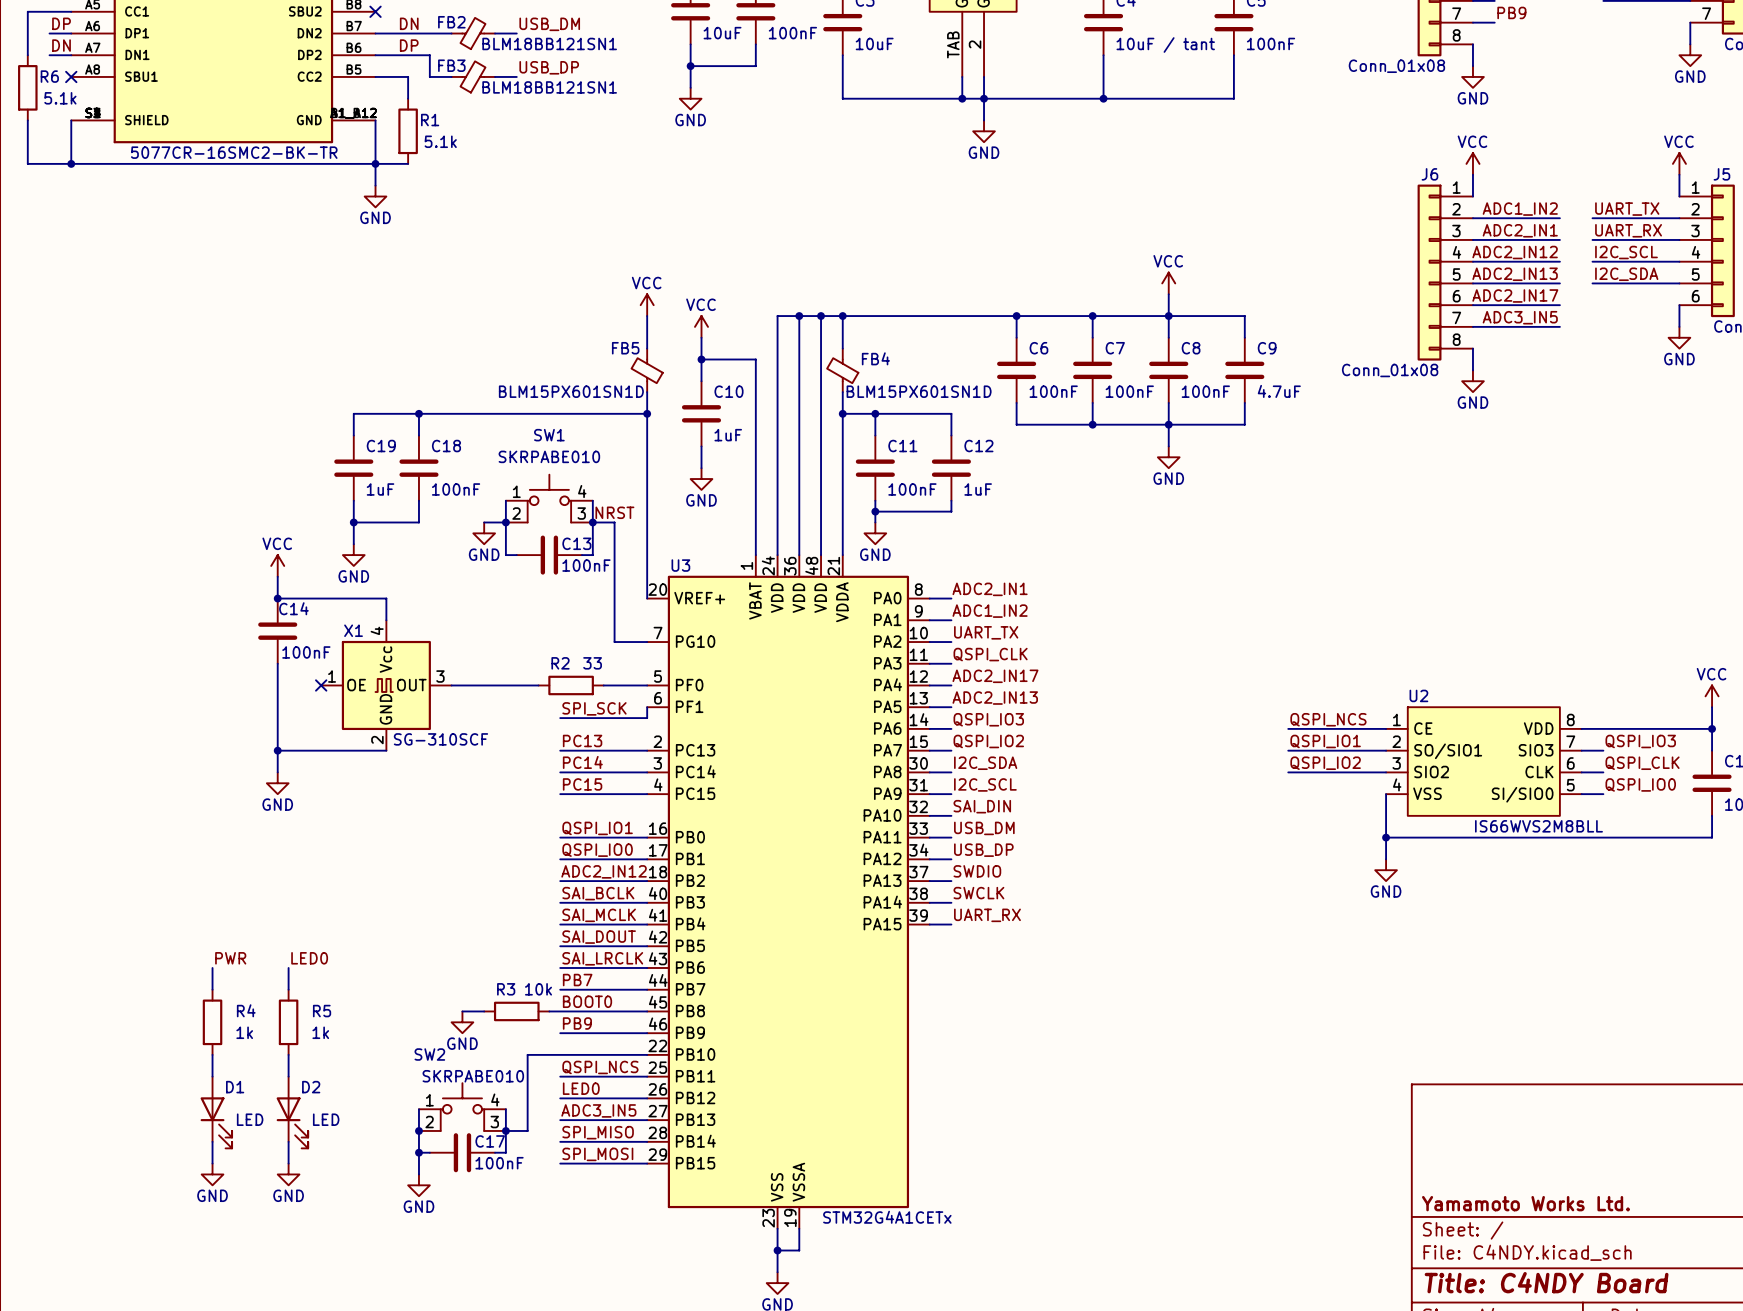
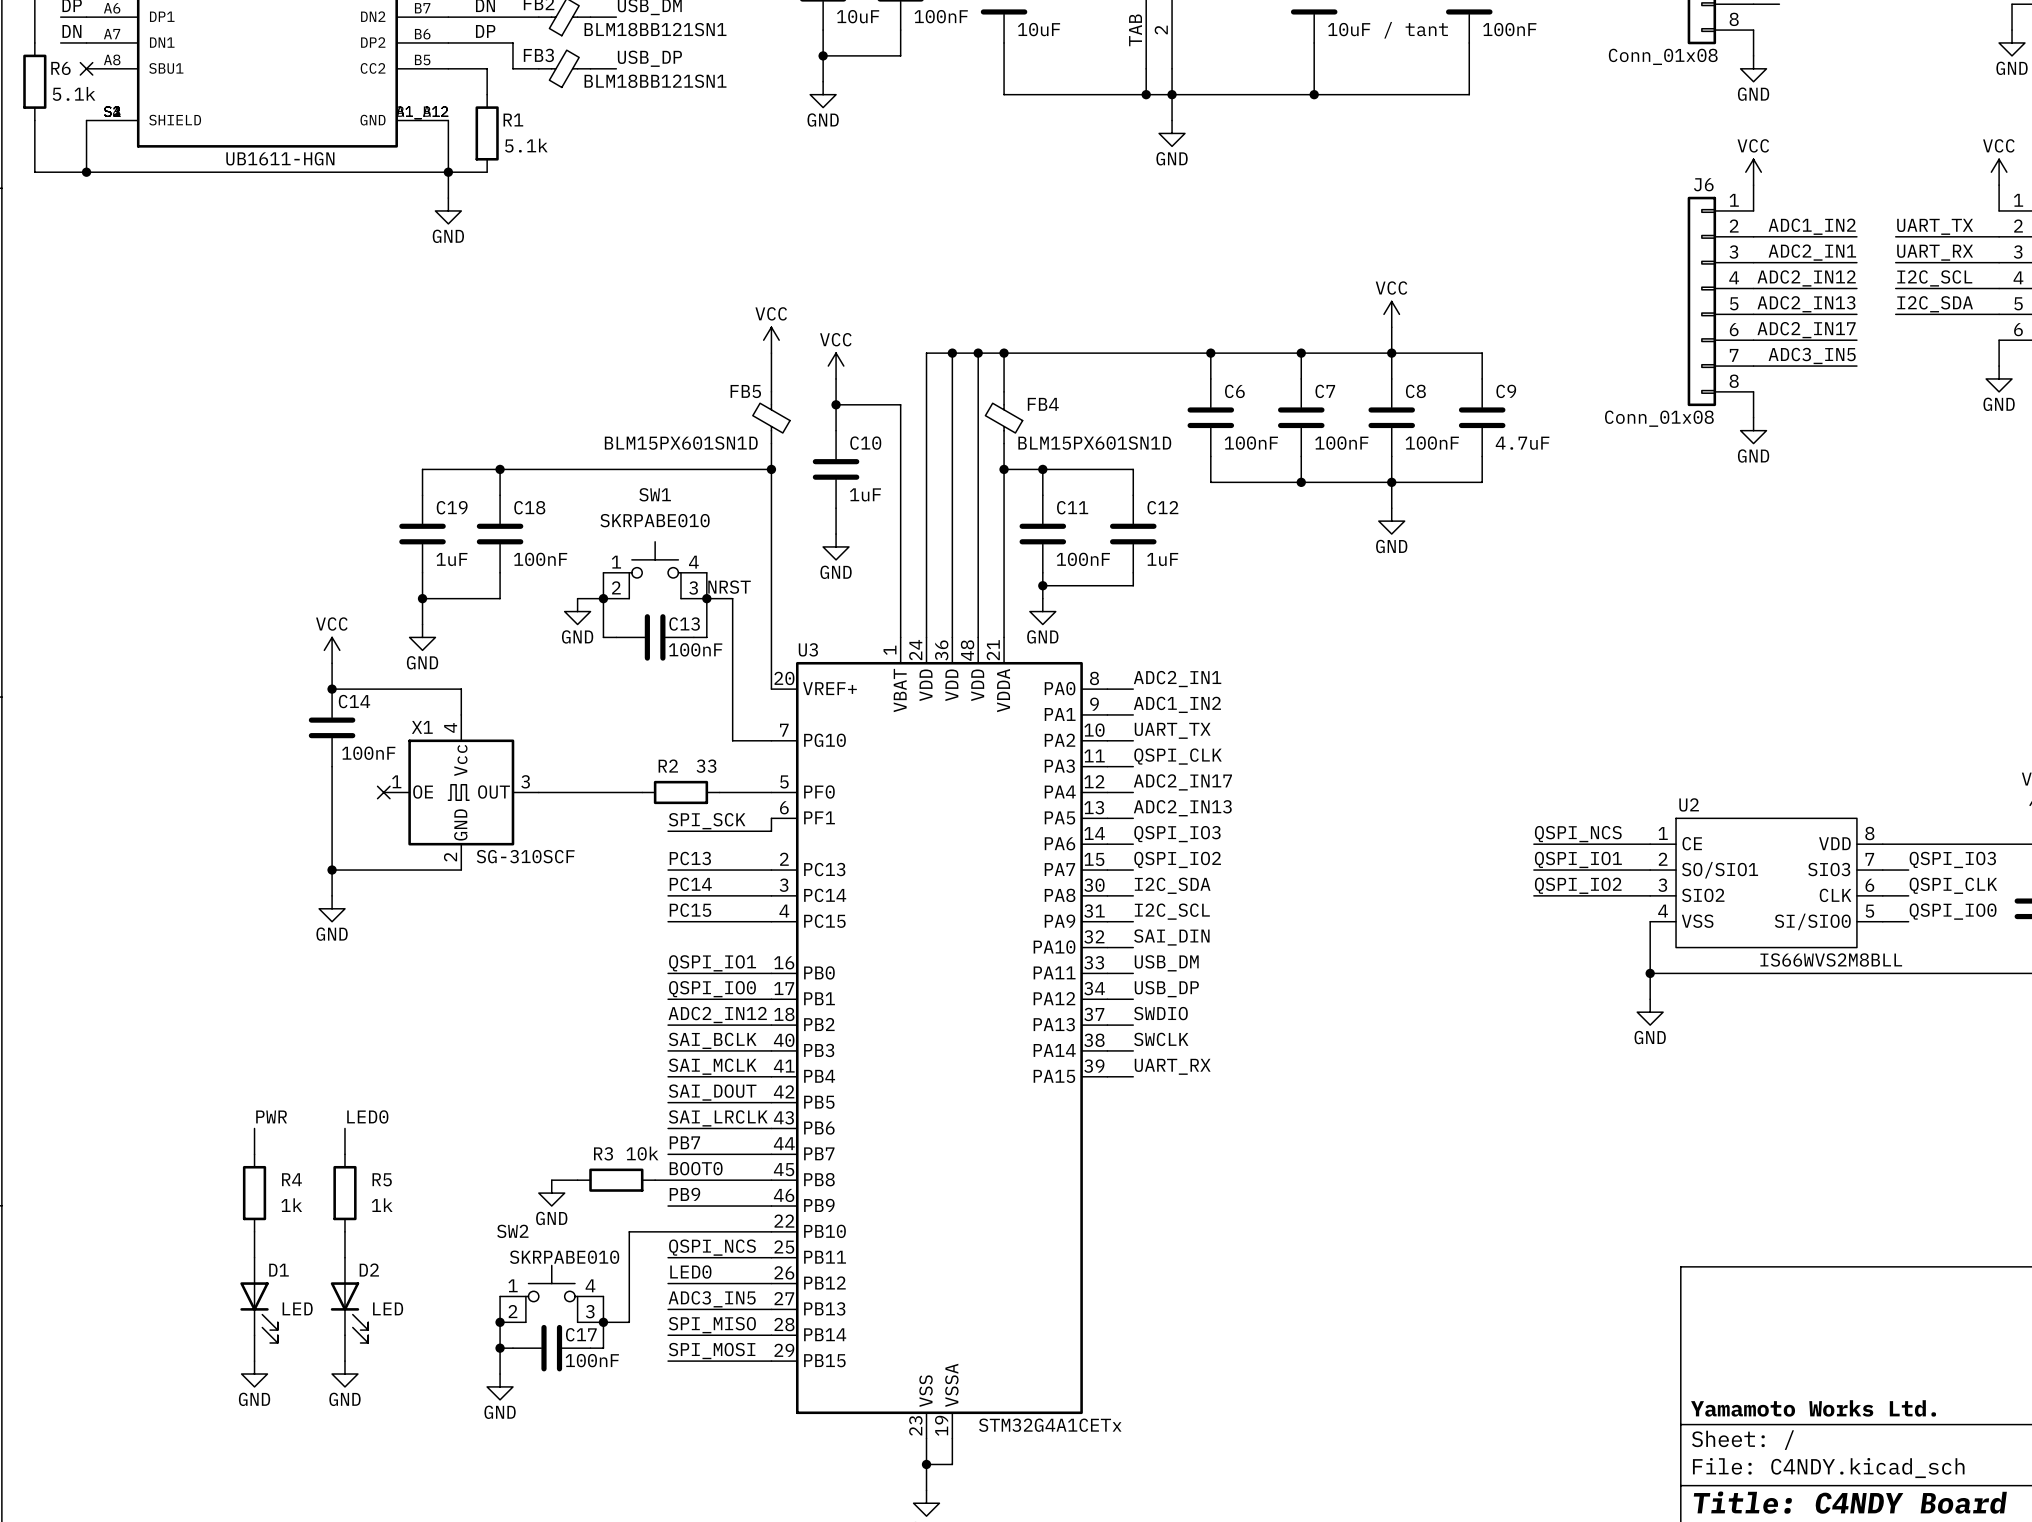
part value: 5077CR-16SMC2-BK-TR (234, 152) -> UB1611-HGN (280, 158)

